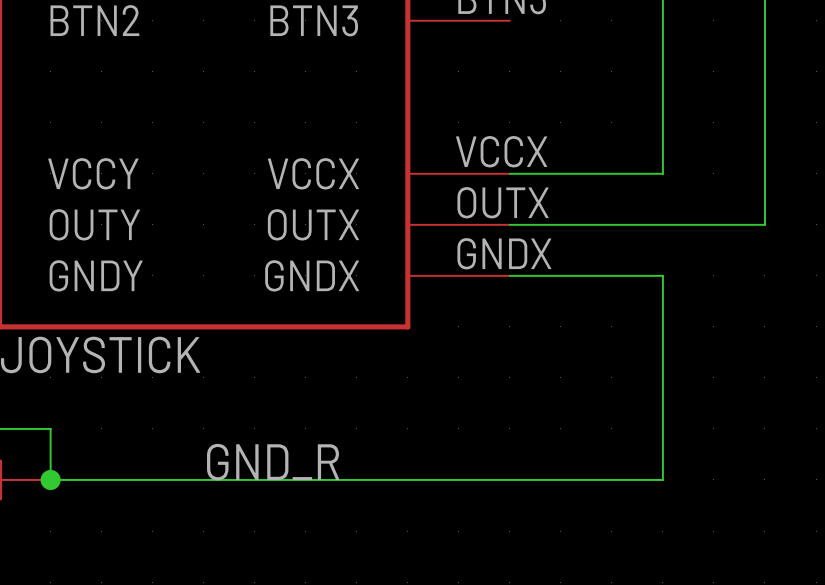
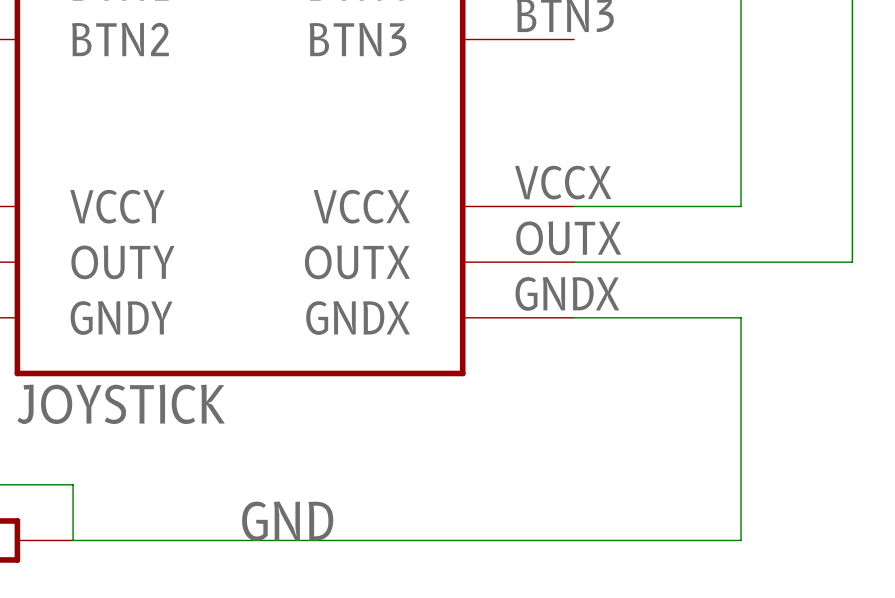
label: GND_R (273, 462) -> GND (287, 521)
junction: (50, 479) -> none

